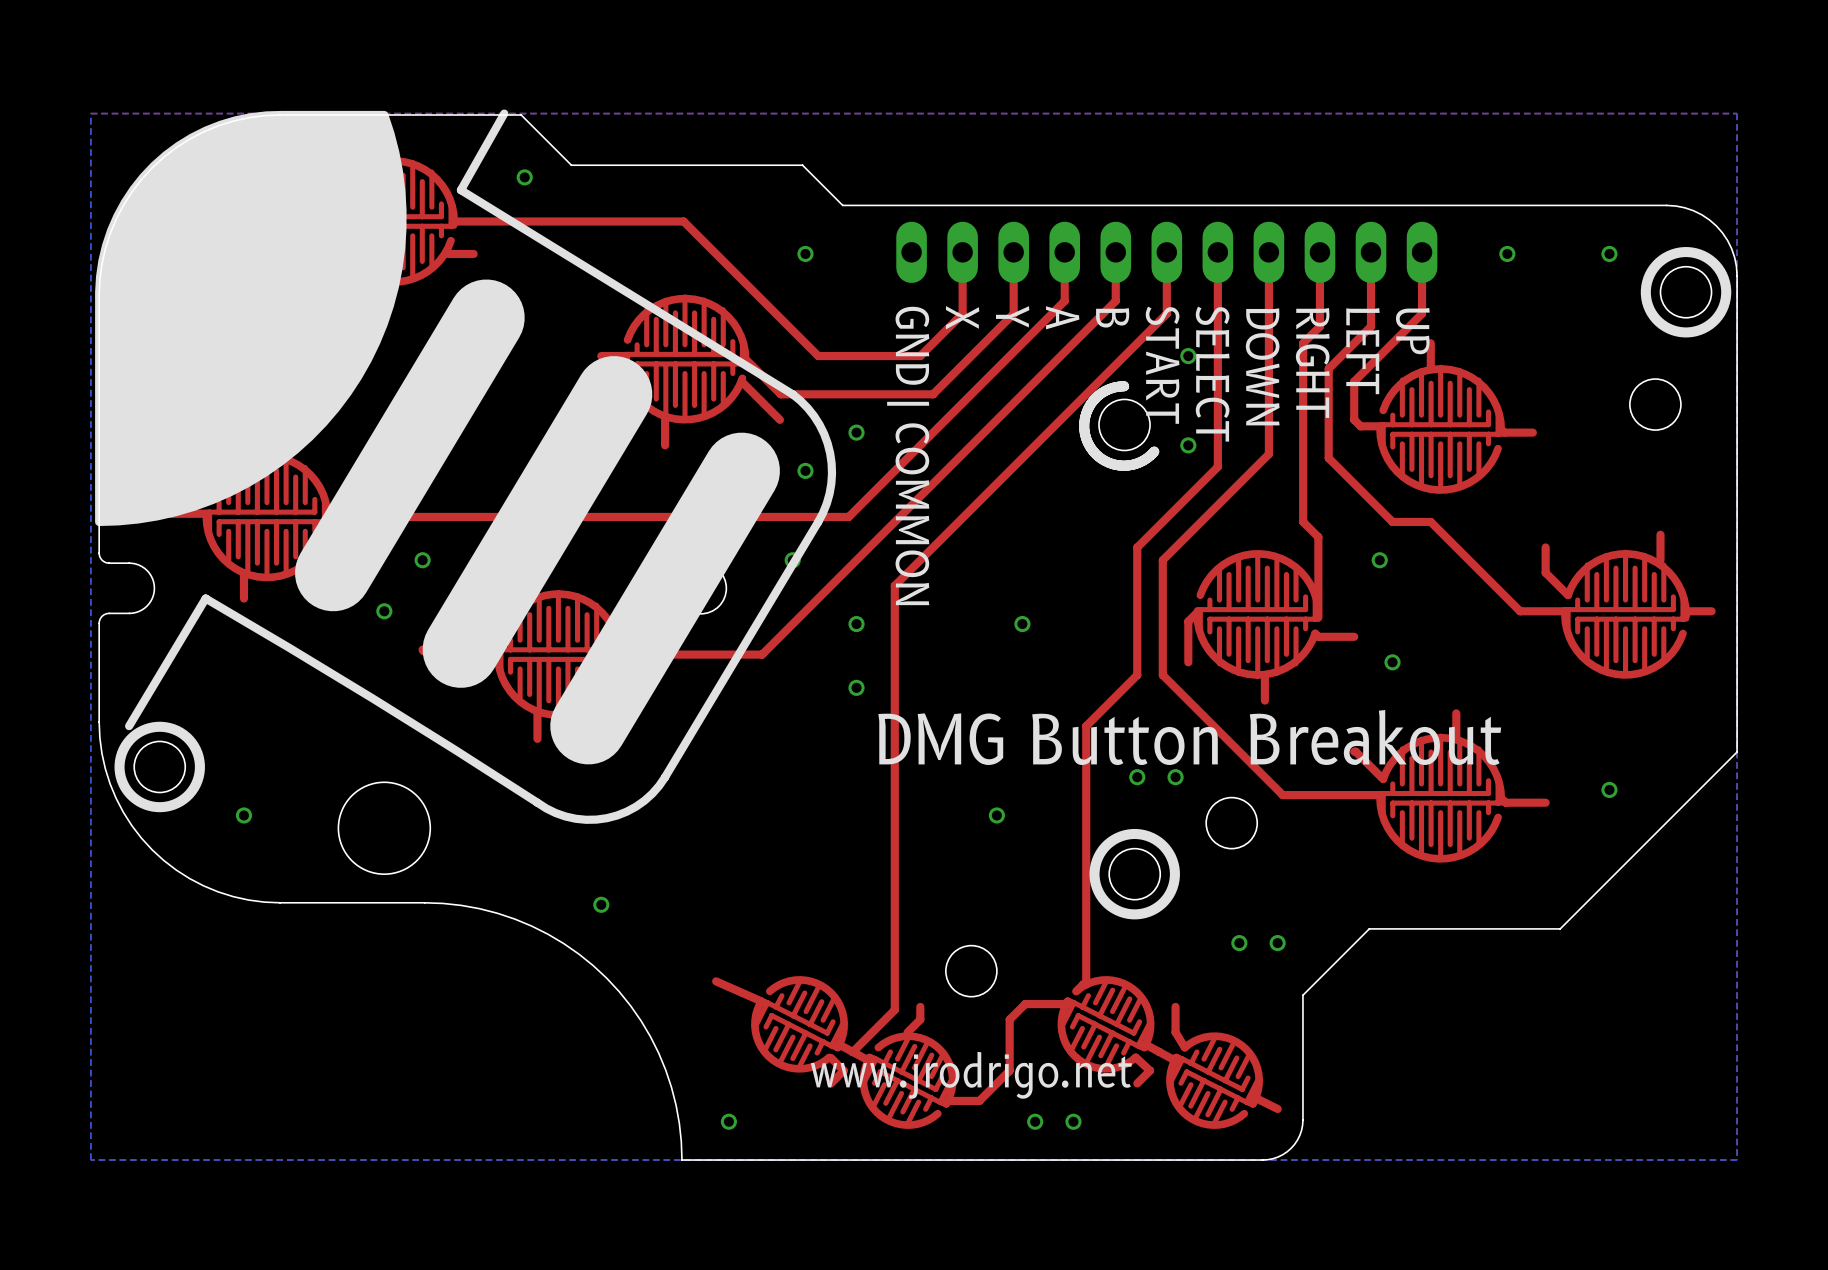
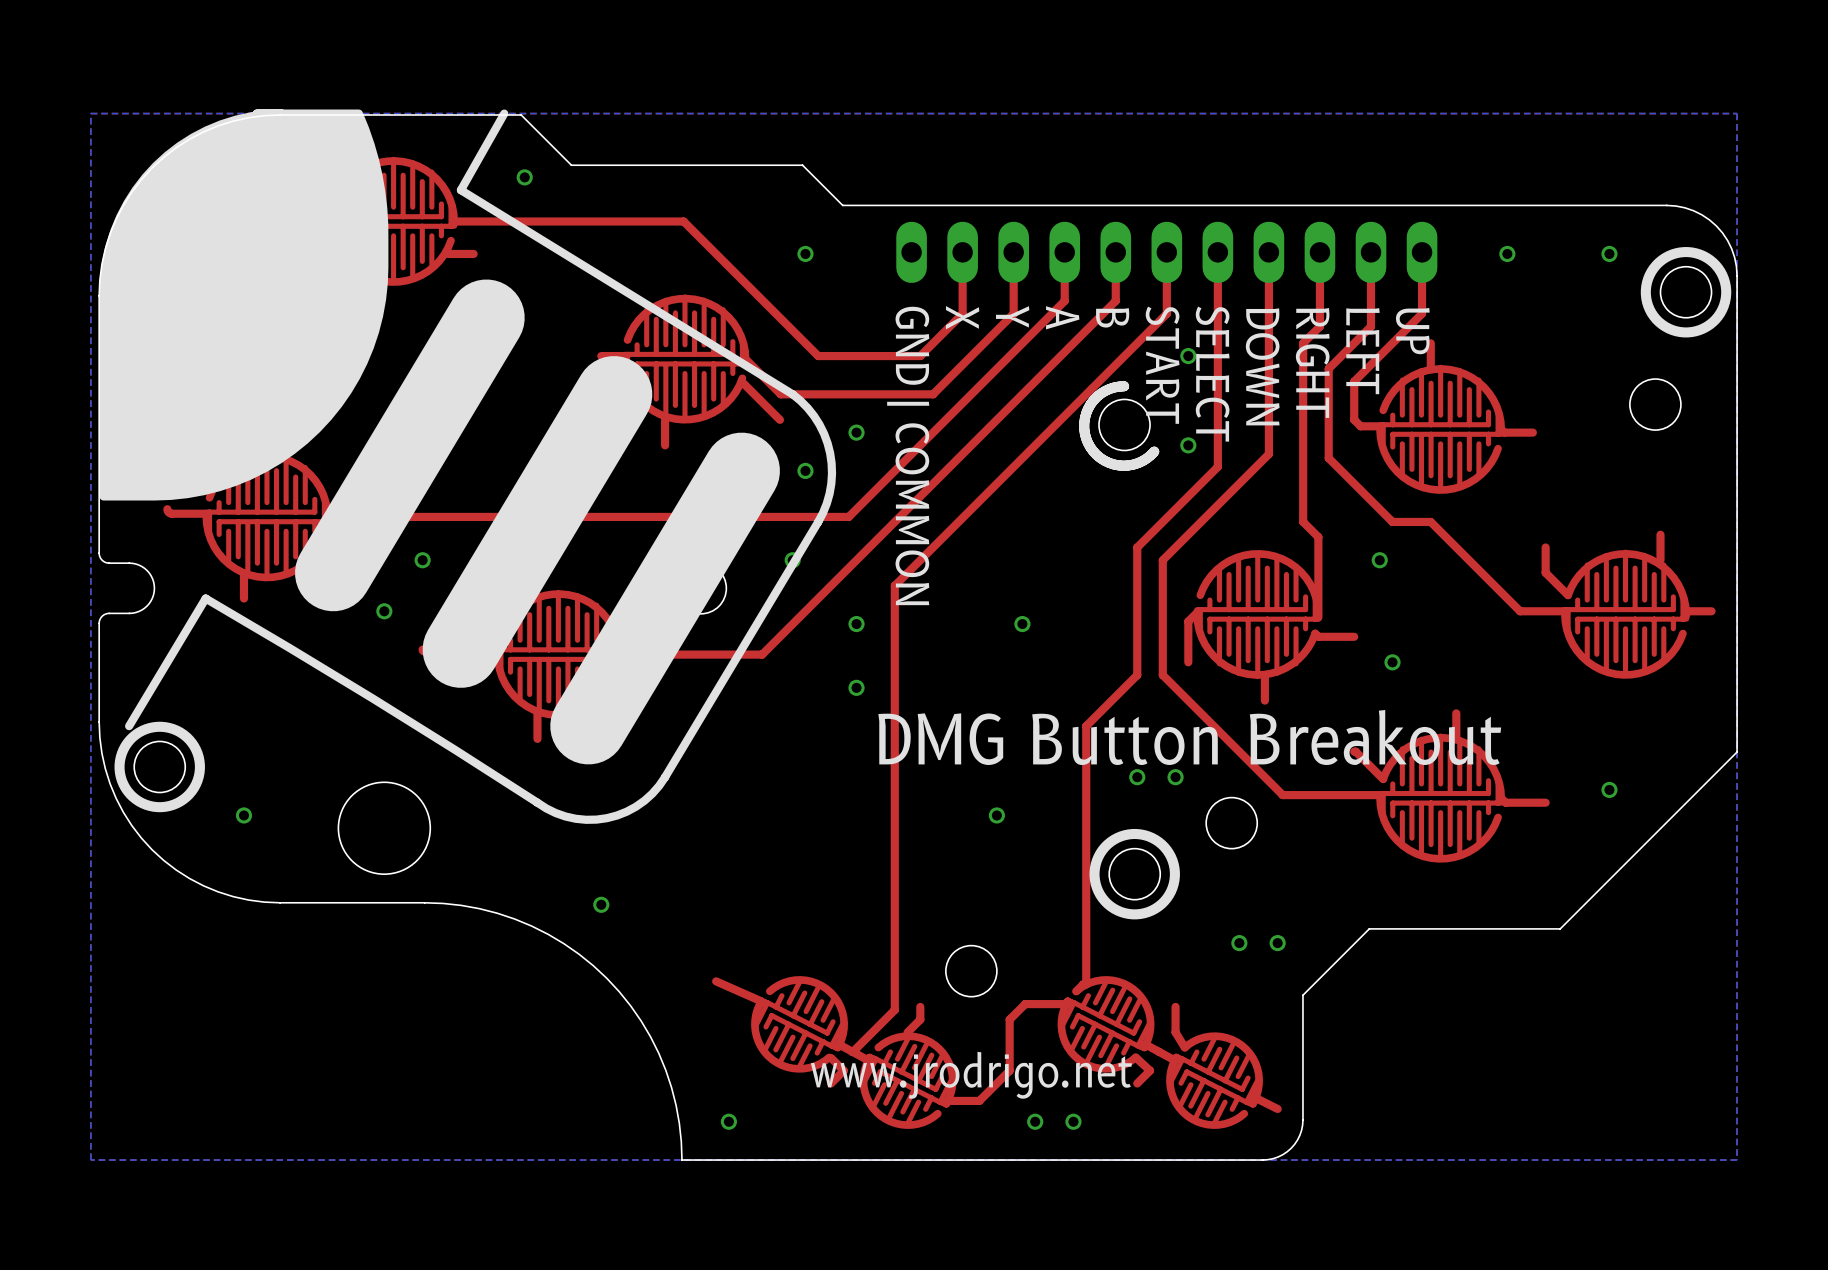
drawing shape: [95, 110, 407, 527] -> [99, 109, 389, 501]

